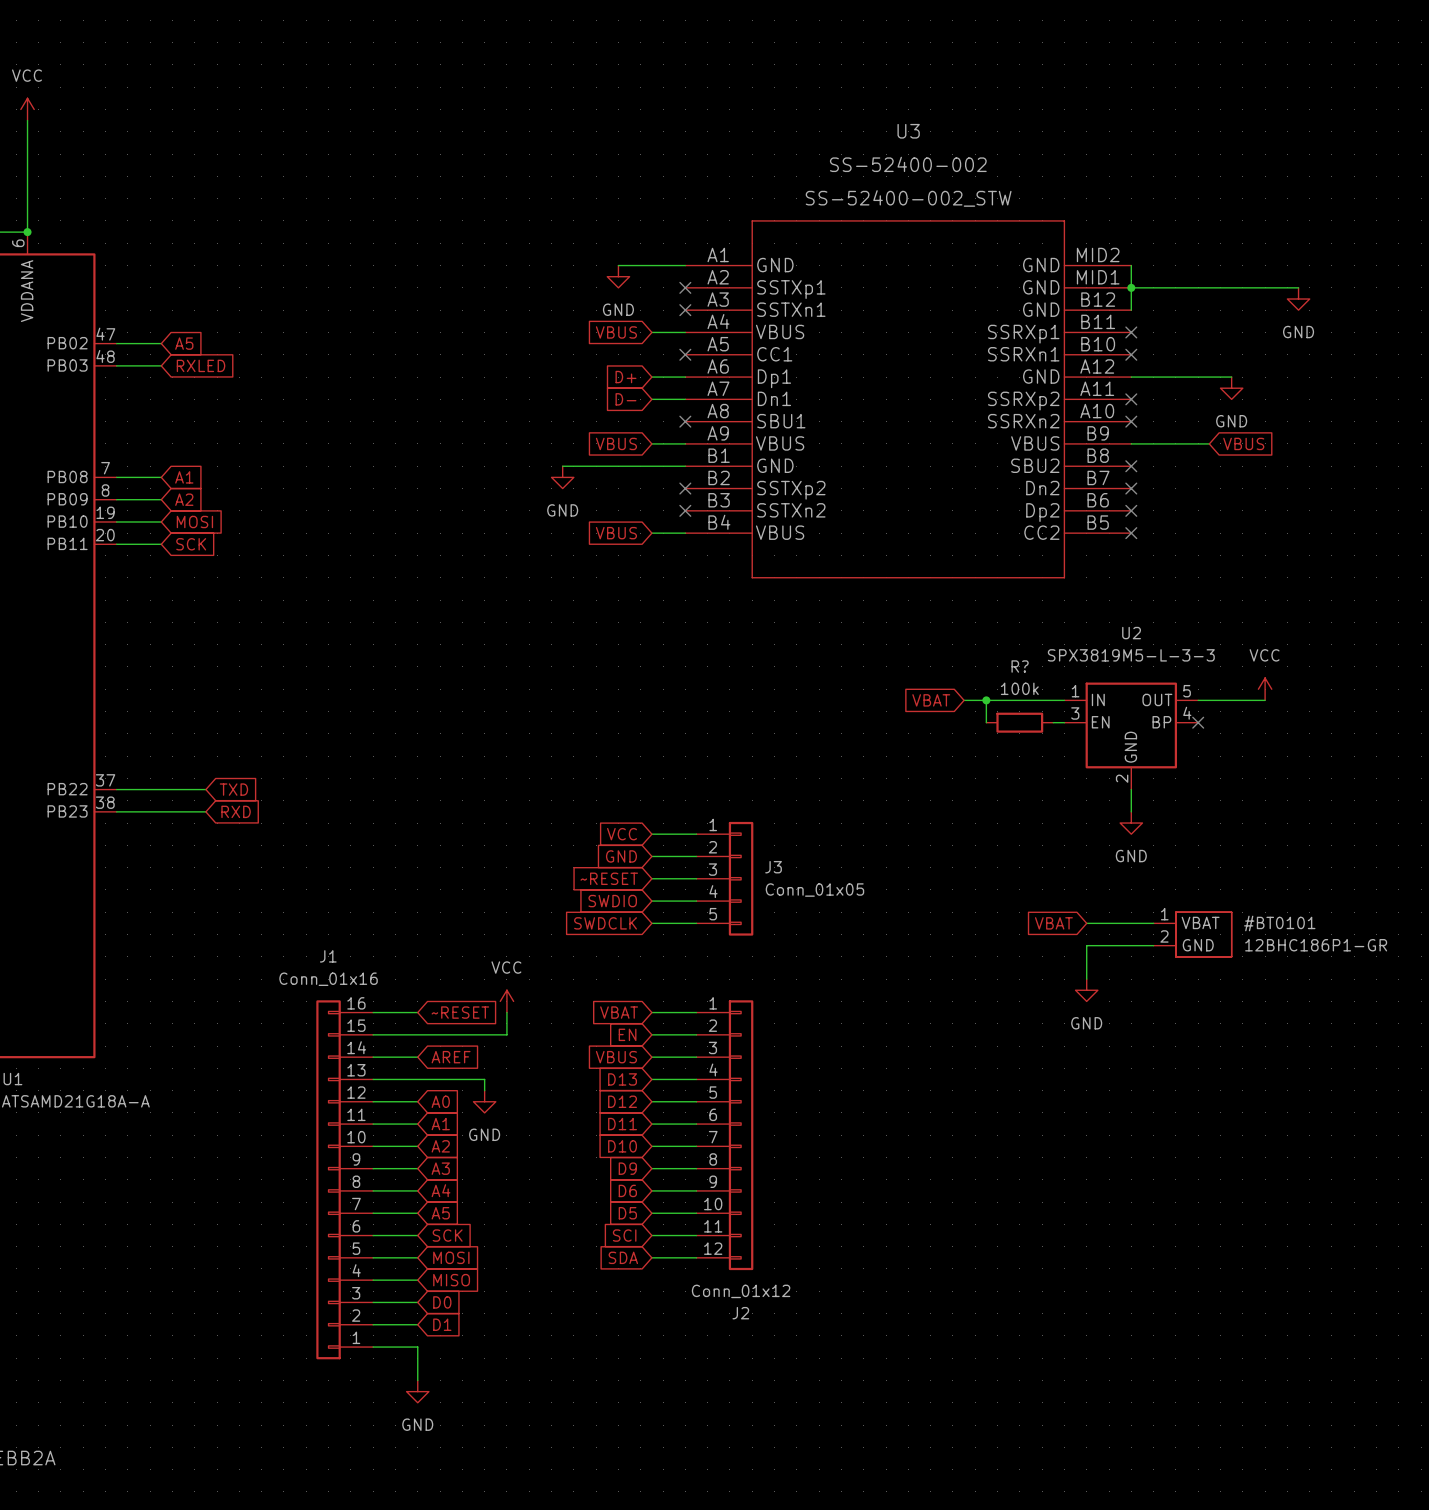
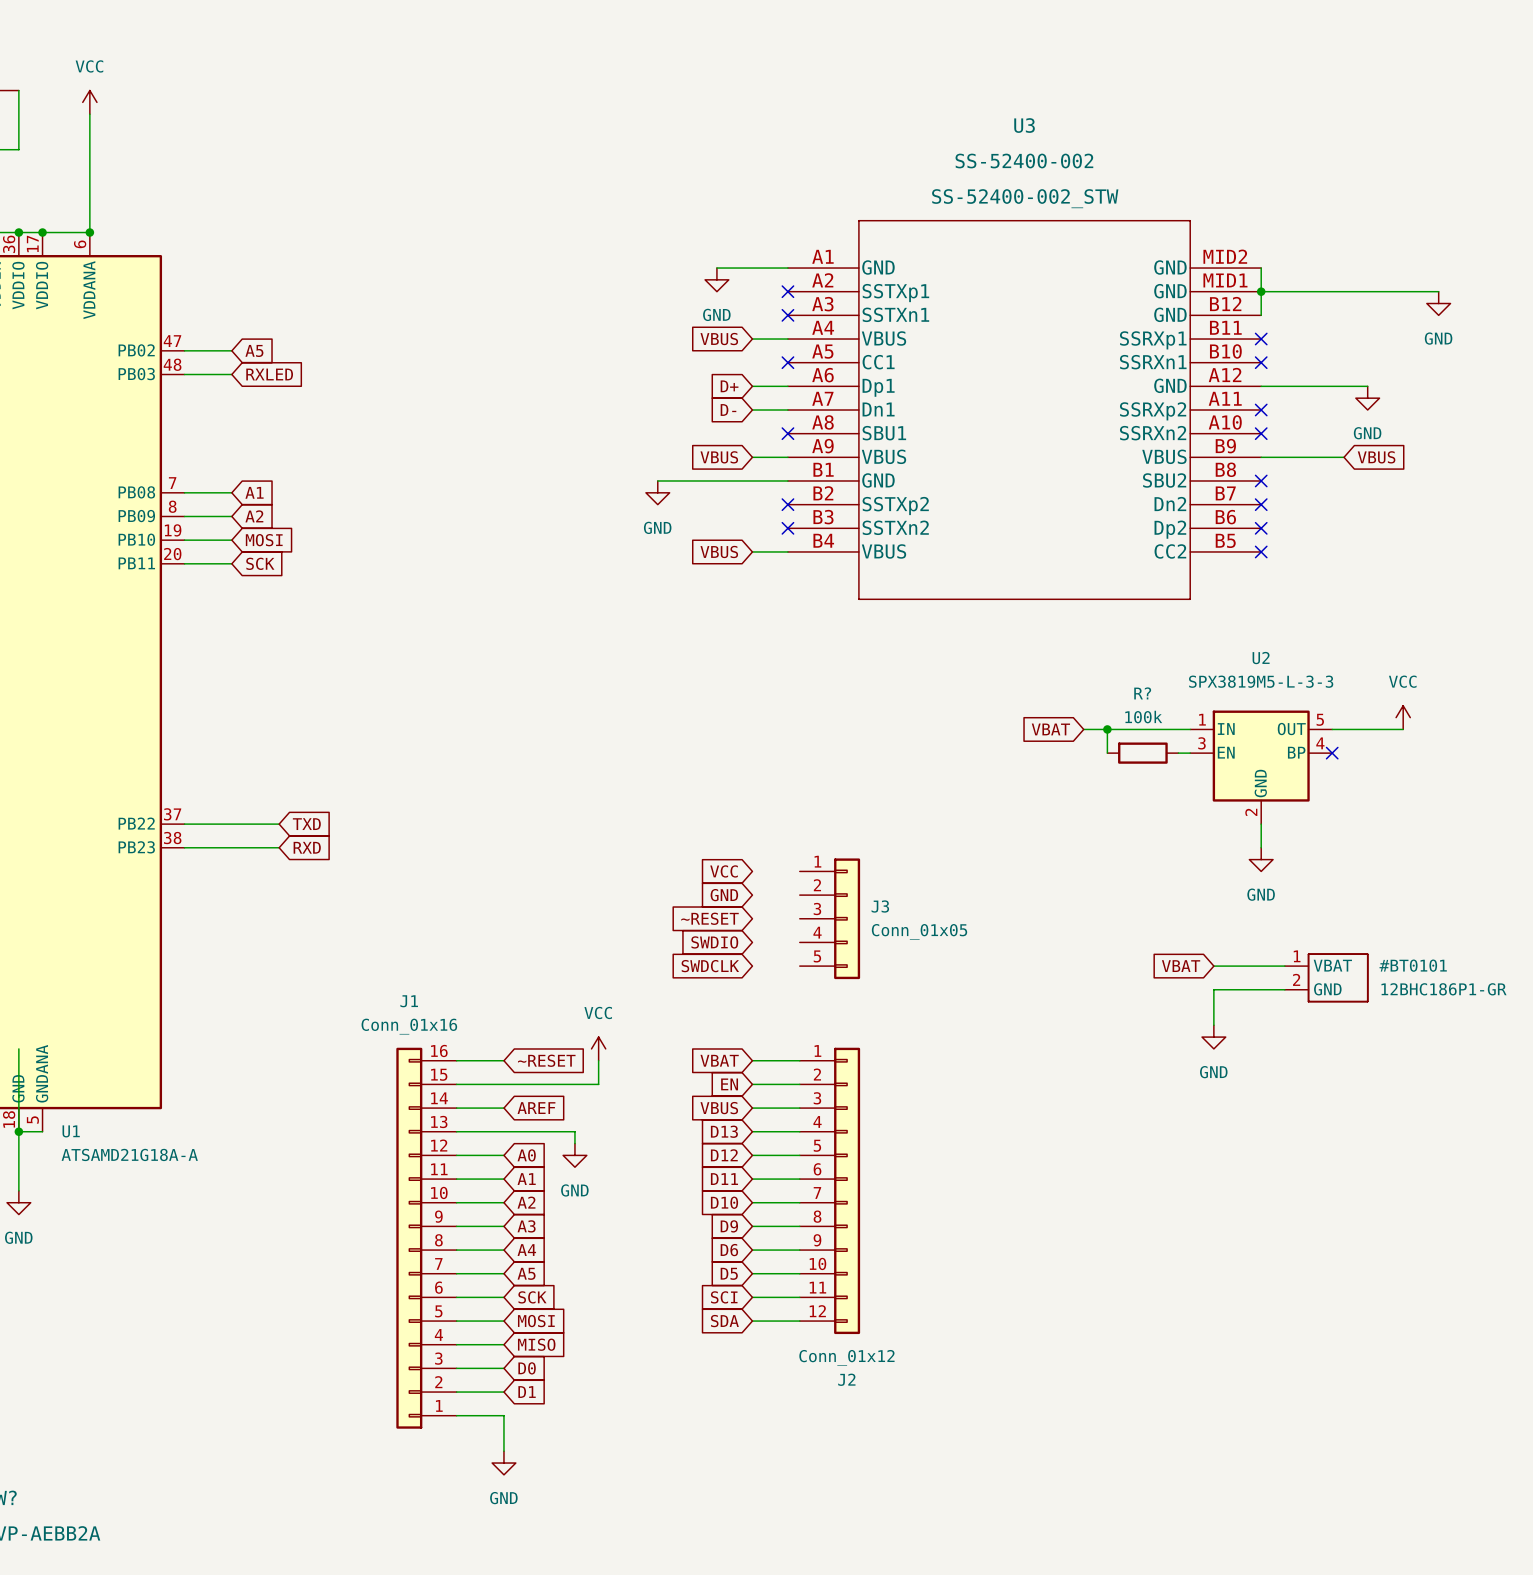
wire: (651, 834) (696, 834) -> none
wire: (651, 856) (696, 856) -> none
wire: (651, 878) (696, 878) -> none
wire: (651, 901) (696, 901) -> none
wire: (651, 923) (696, 923) -> none

